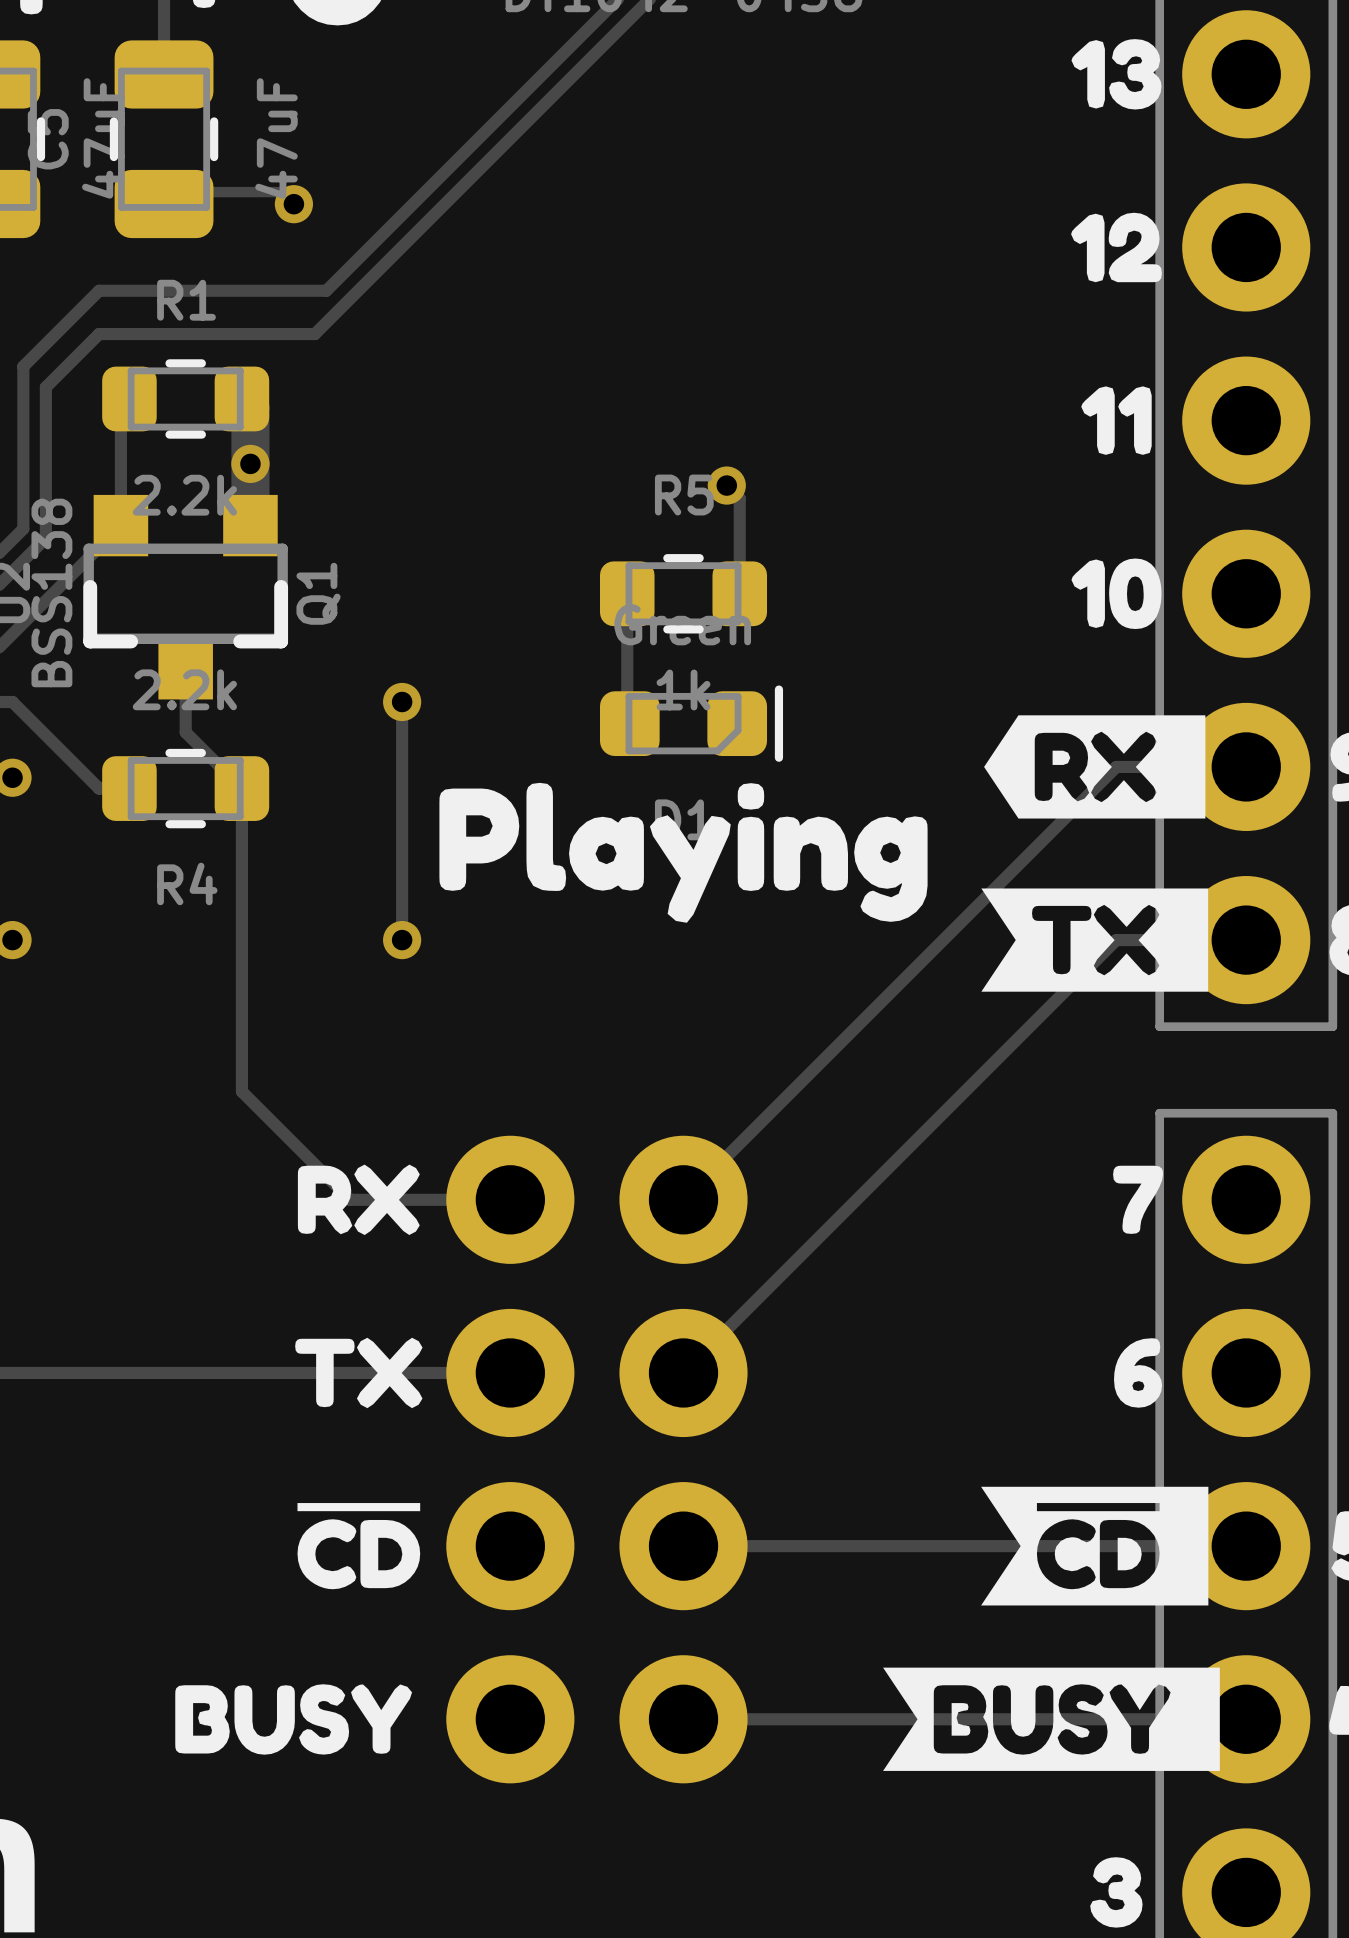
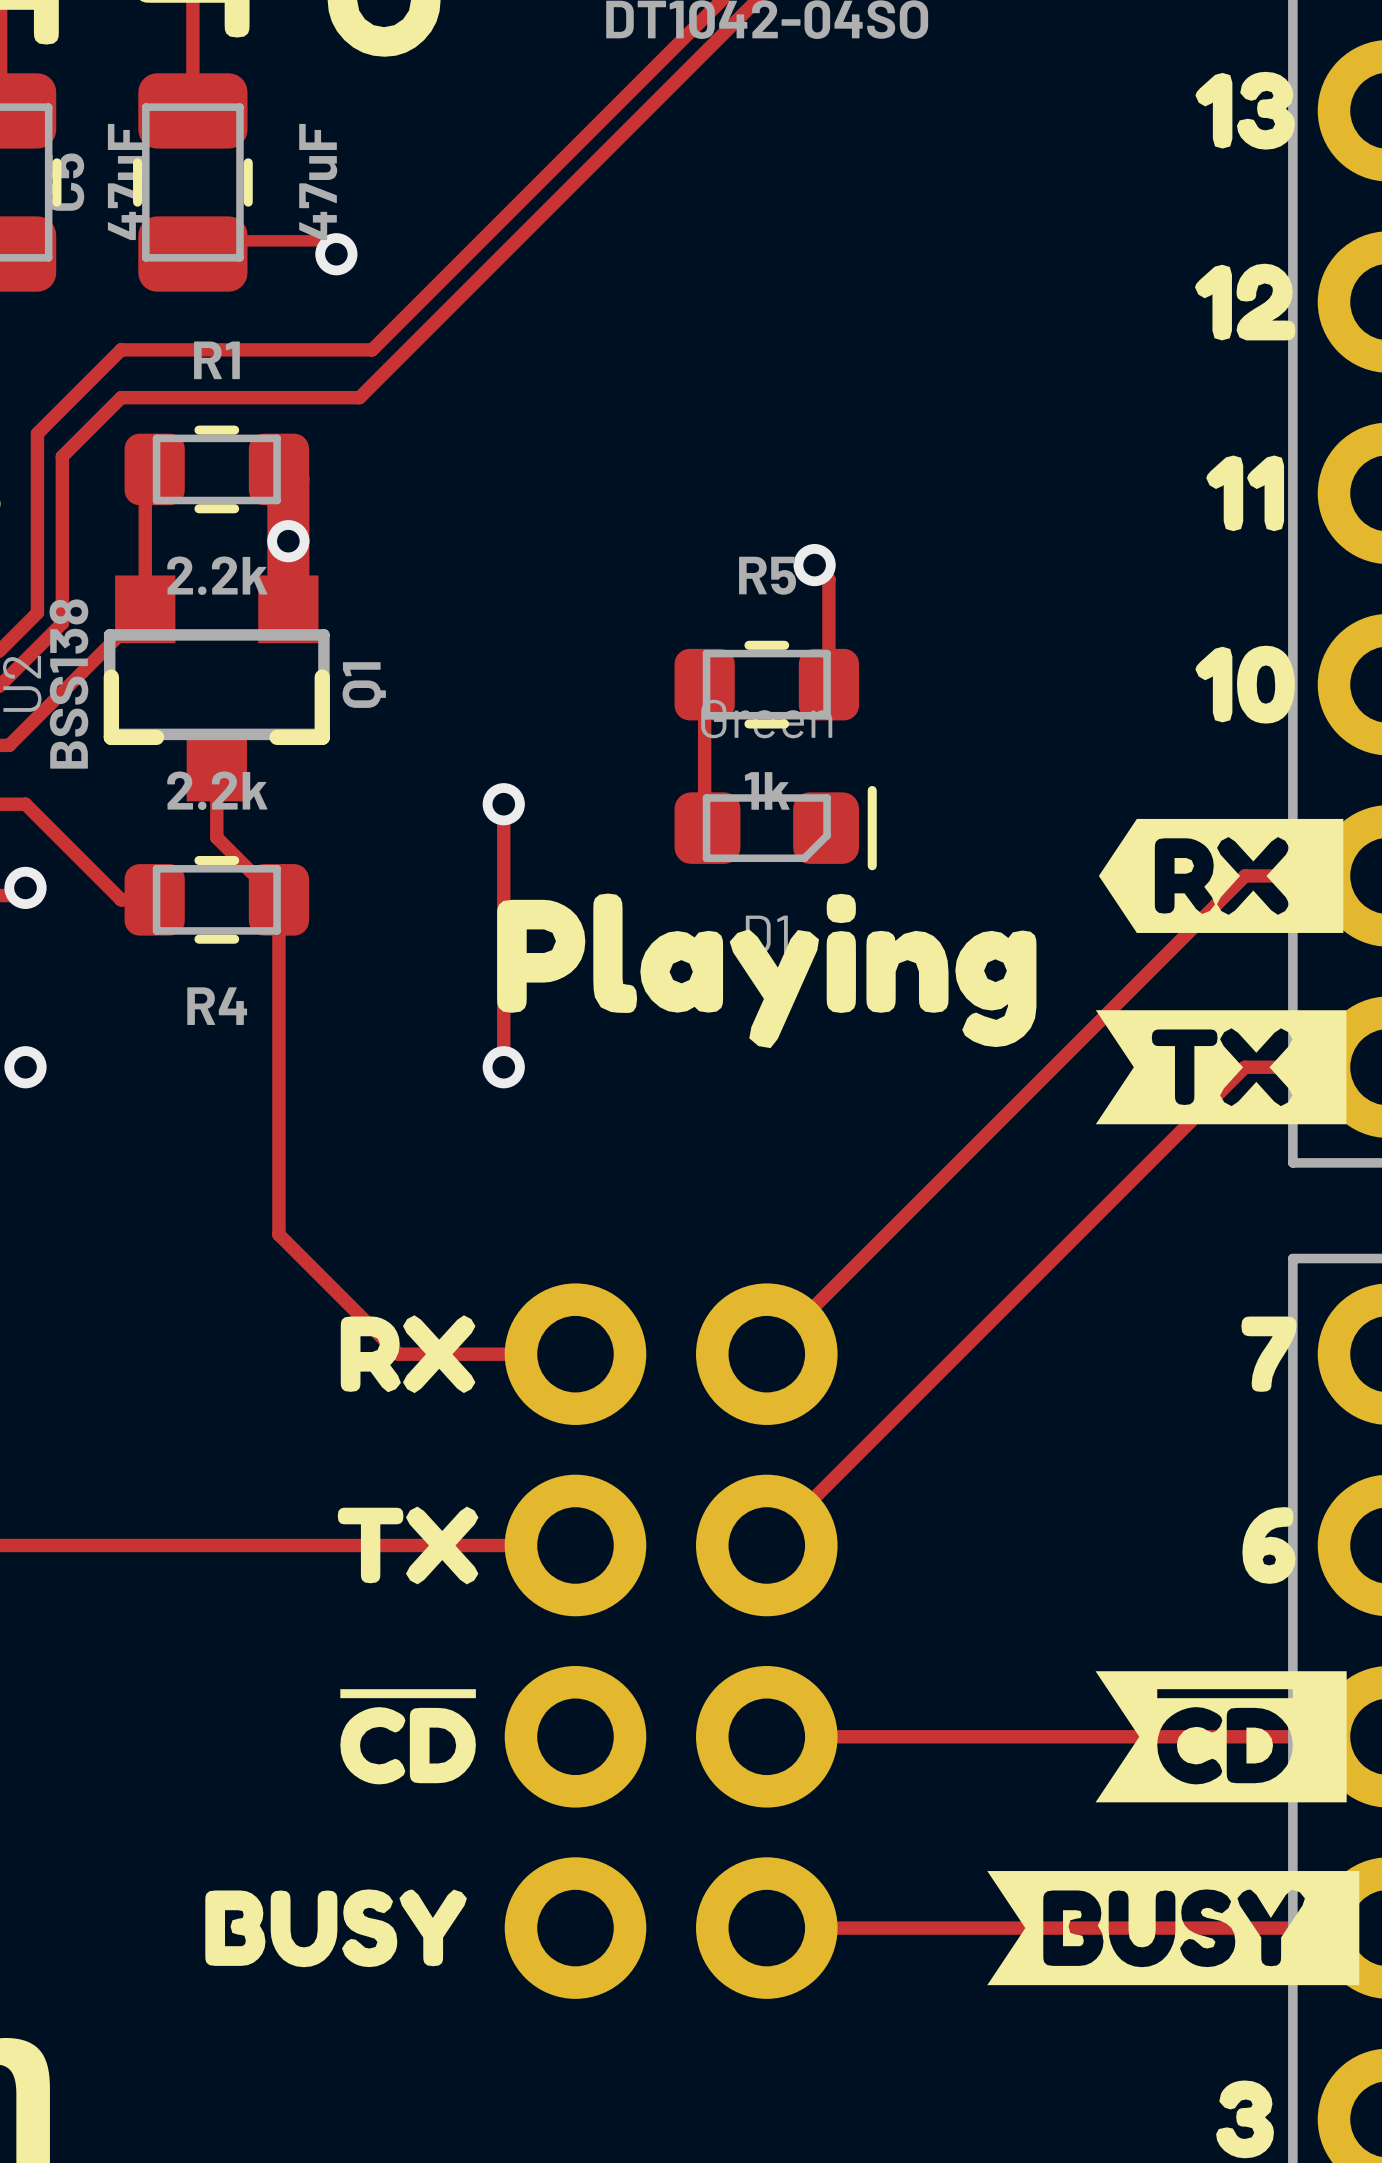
track: (402, 702) (402, 940) -> (503, 804) (503, 1067)
via position: (402, 702) -> (503, 804)
via position: (402, 940) -> (503, 1067)

